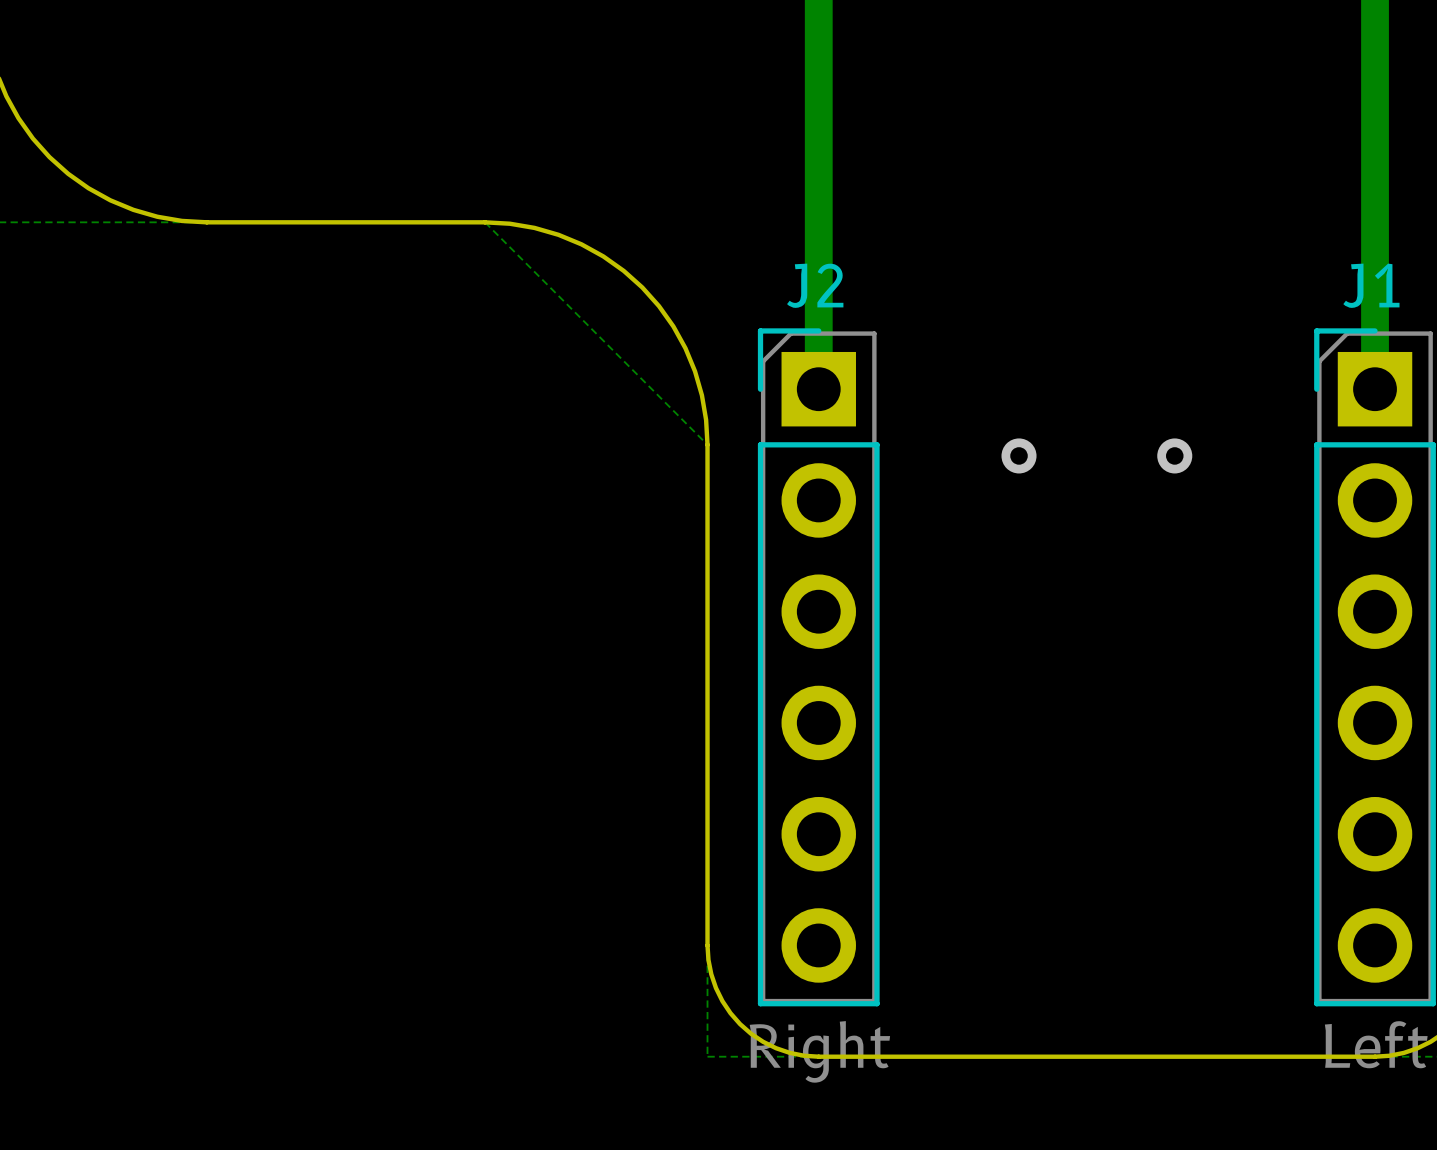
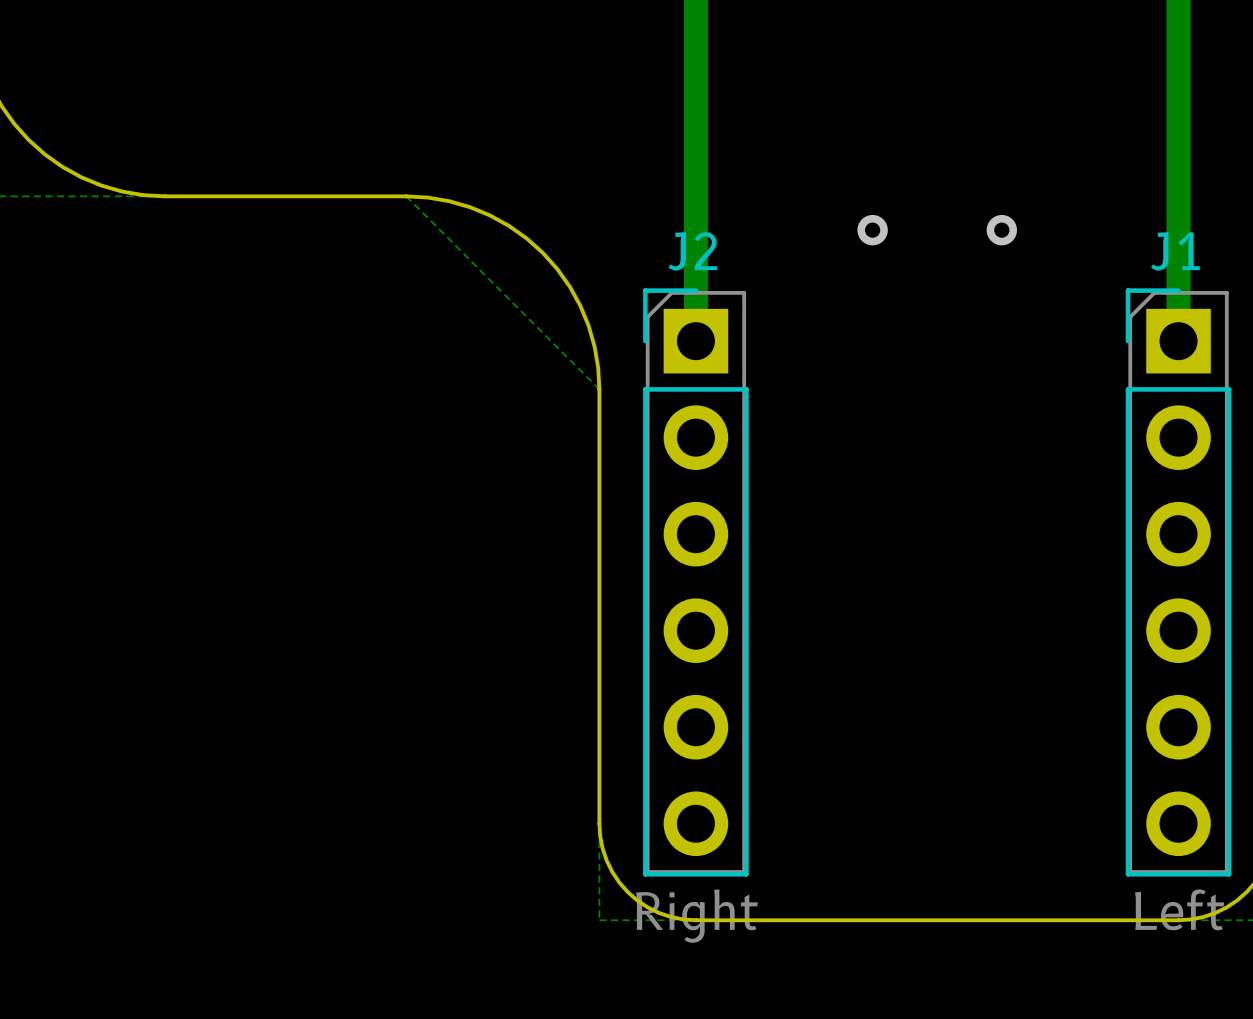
via: none -> (872, 230)
via: none -> (1001, 230)
via: (1019, 455) -> none
via: (1174, 455) -> none

